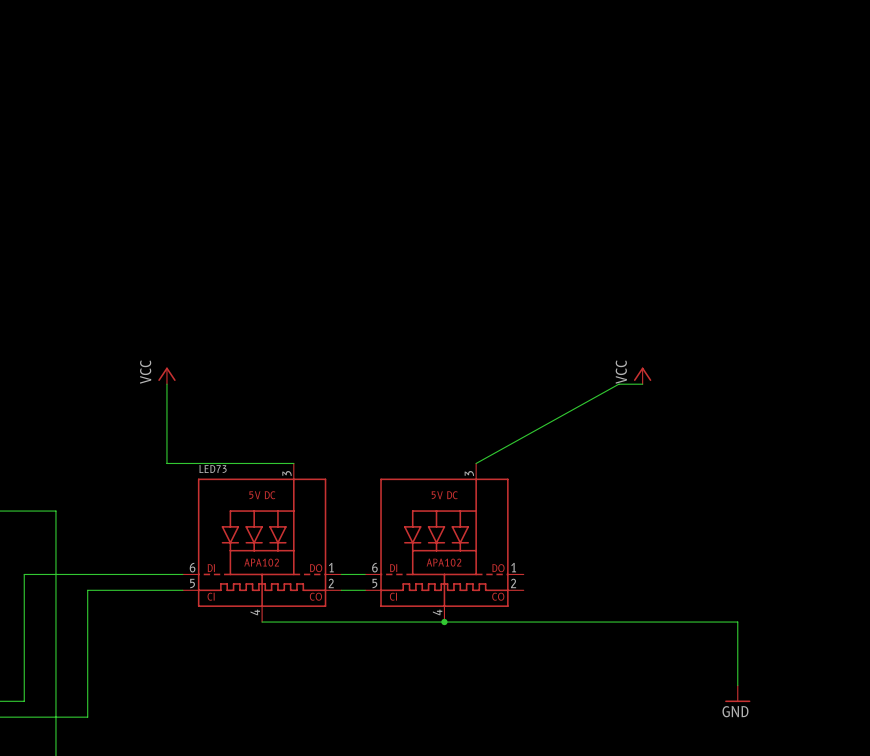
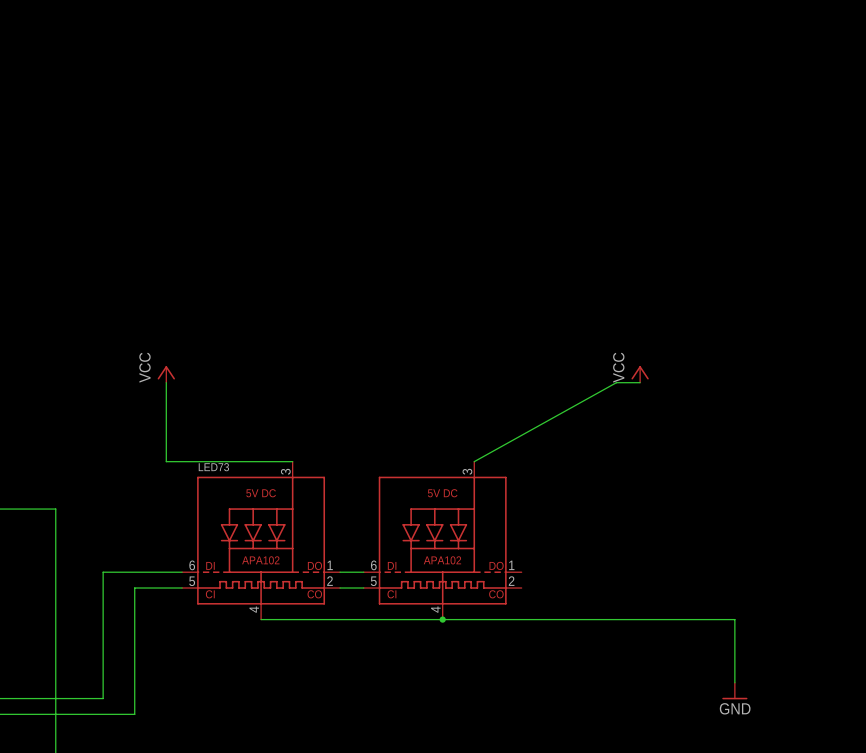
wire: (103, 574) (24, 574) (24, 701) -> (103, 572) (103, 698) (24, 698)
wire: (135, 590) (87, 590) (87, 717) -> (134, 588) (134, 714) (87, 714)

